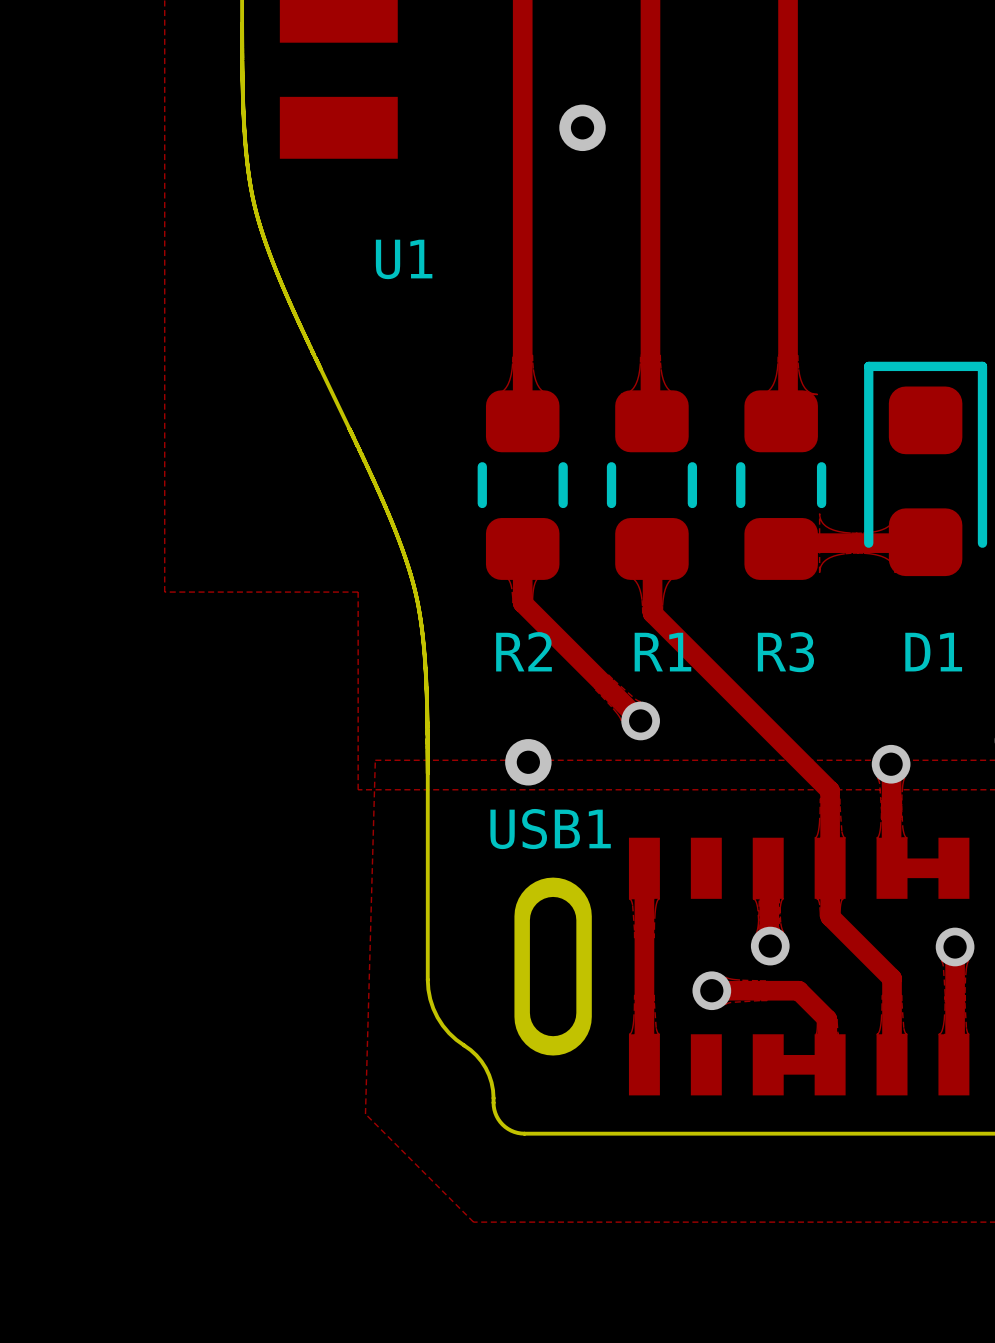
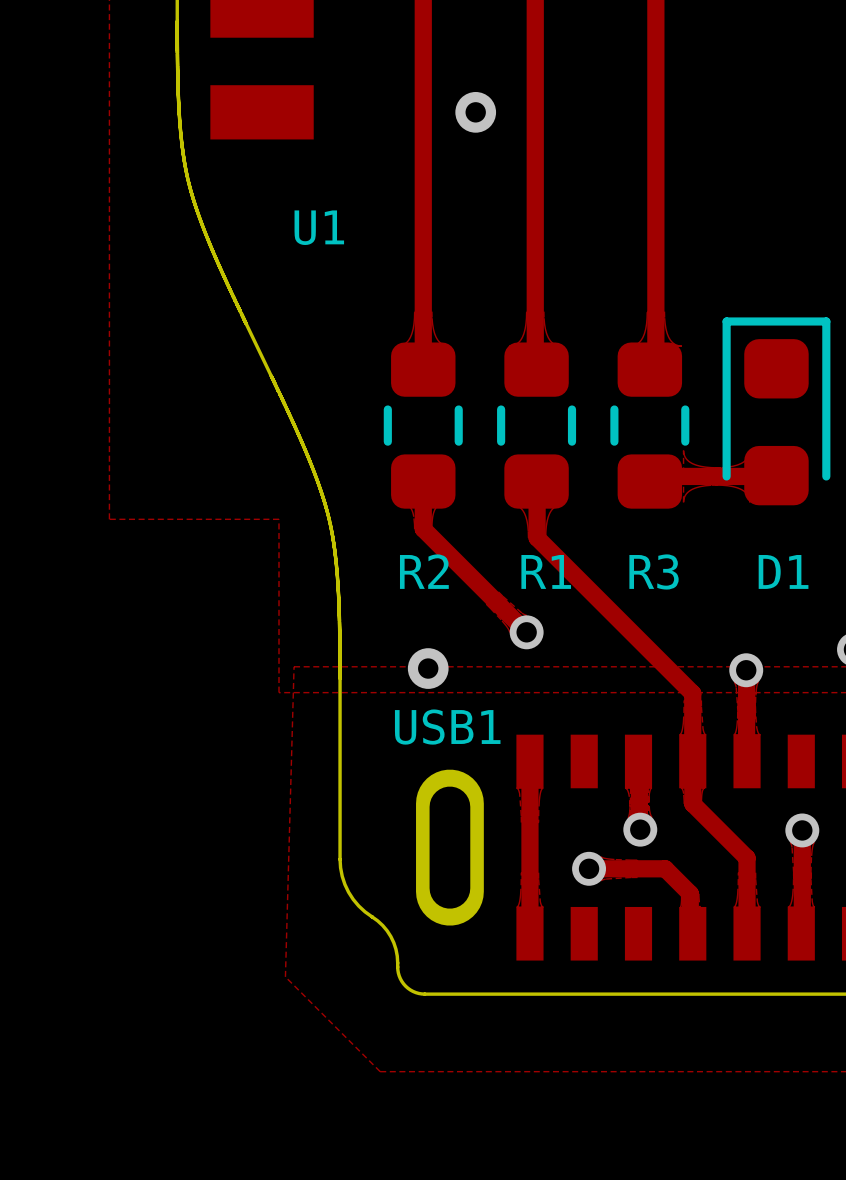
track: (892, 868) (953, 868) -> none
track: (768, 1064) (830, 1064) -> none

